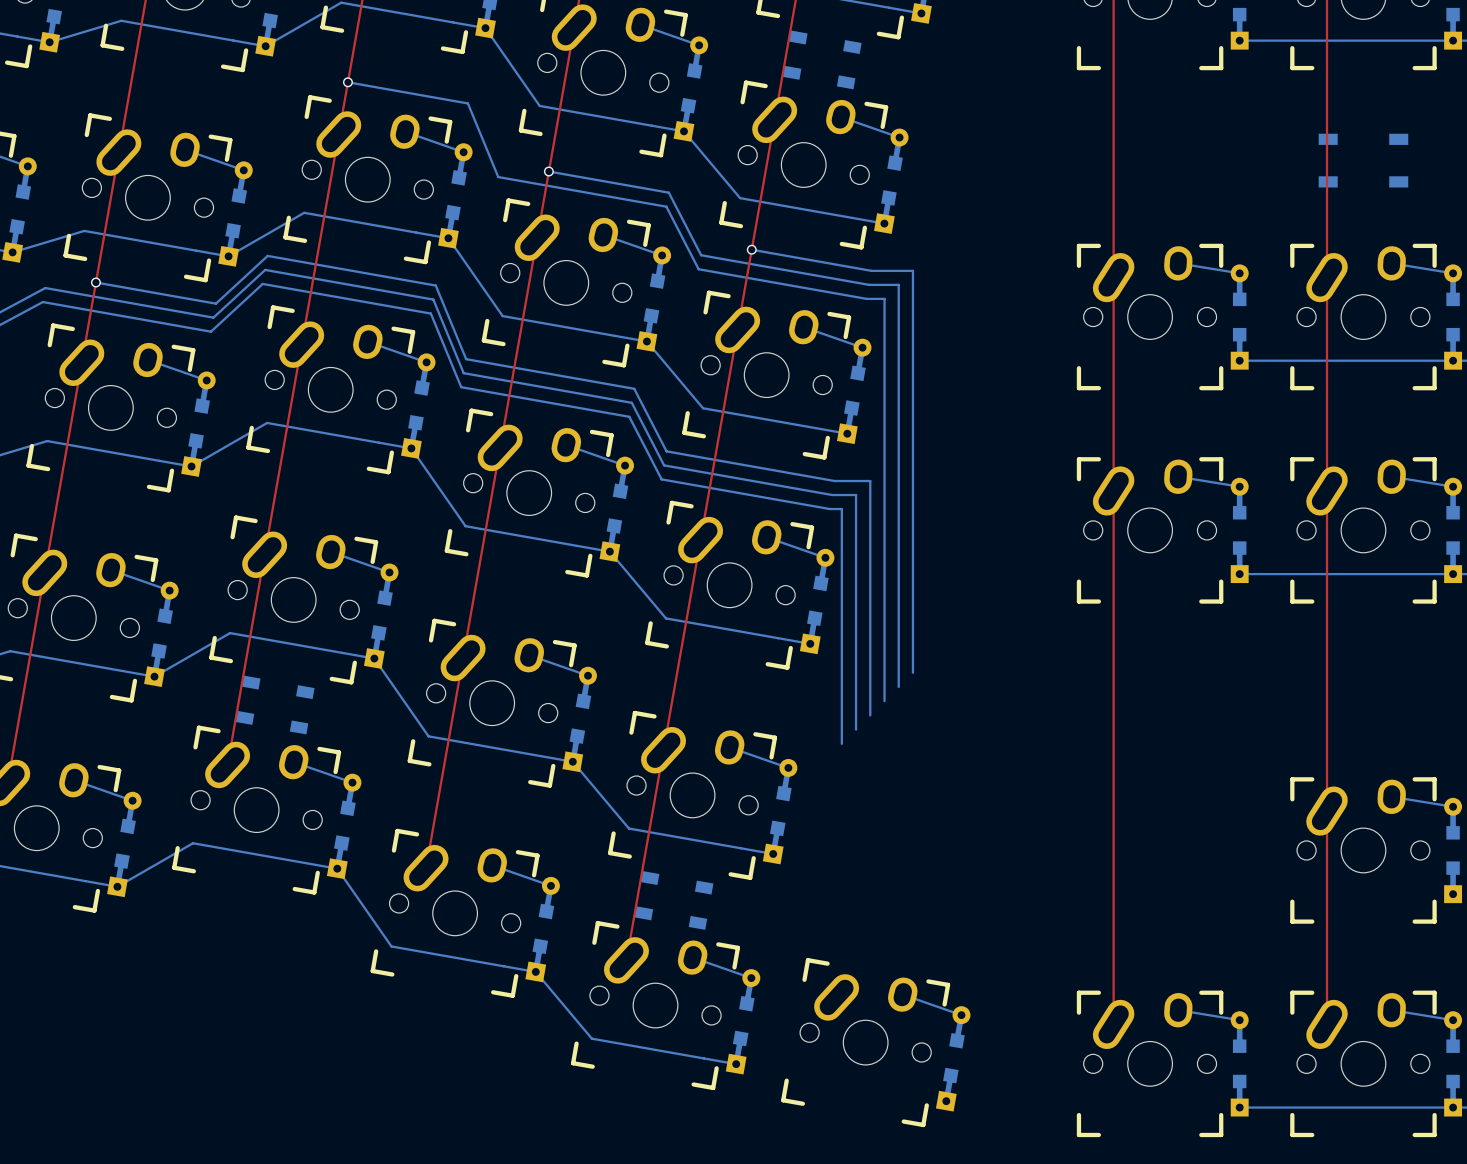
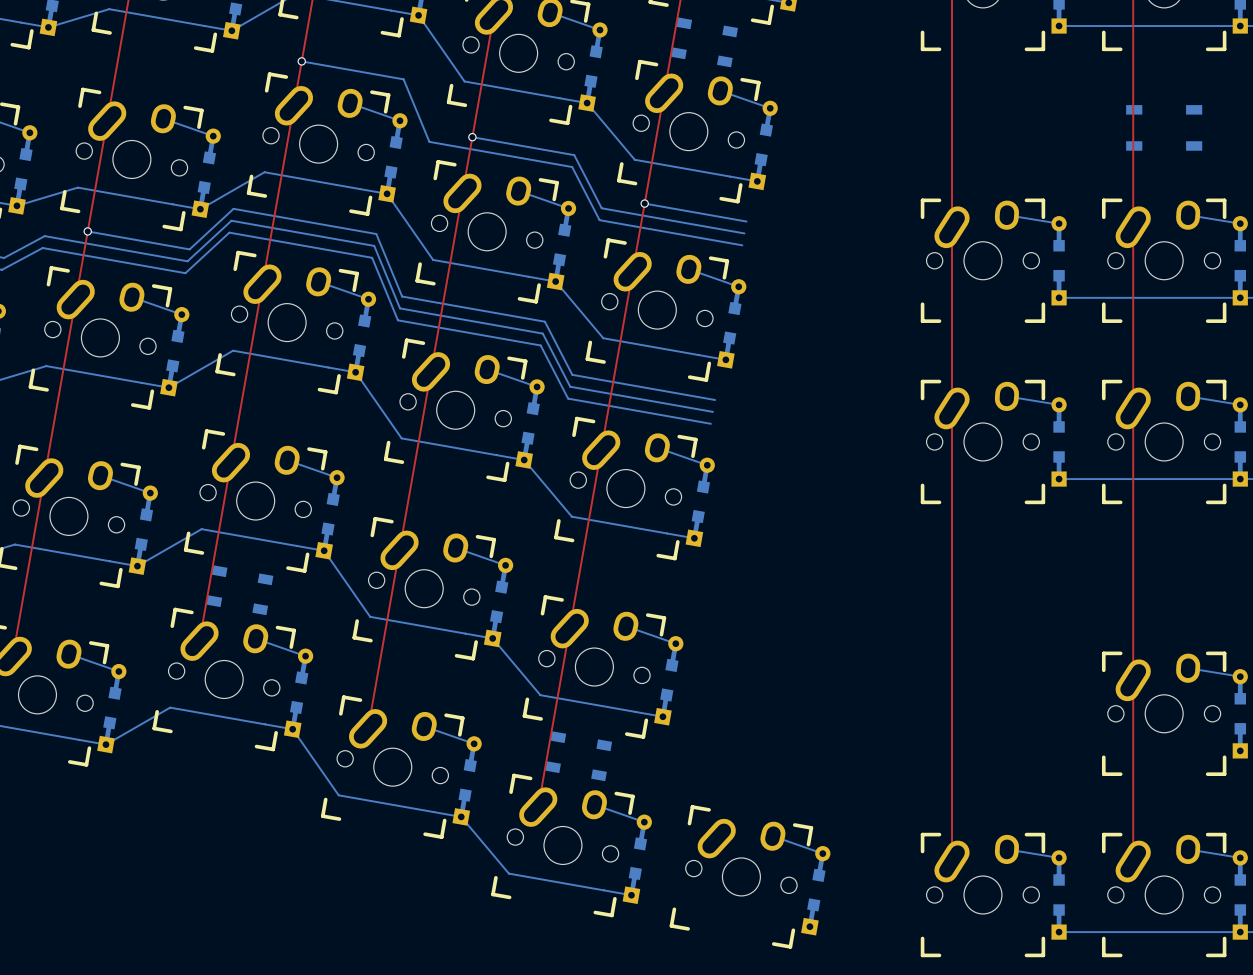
bottom track: (871, 270) (912, 270) (912, 672) -> none
bottom track: (869, 284) (898, 284) (898, 686) -> none
bottom track: (866, 298) (884, 298) (884, 701) -> none
bottom track: (834, 481) (870, 481) (870, 715) -> none
bottom track: (832, 495) (856, 495) (856, 729) -> none
bottom track: (829, 509) (841, 509) (841, 743) -> none

